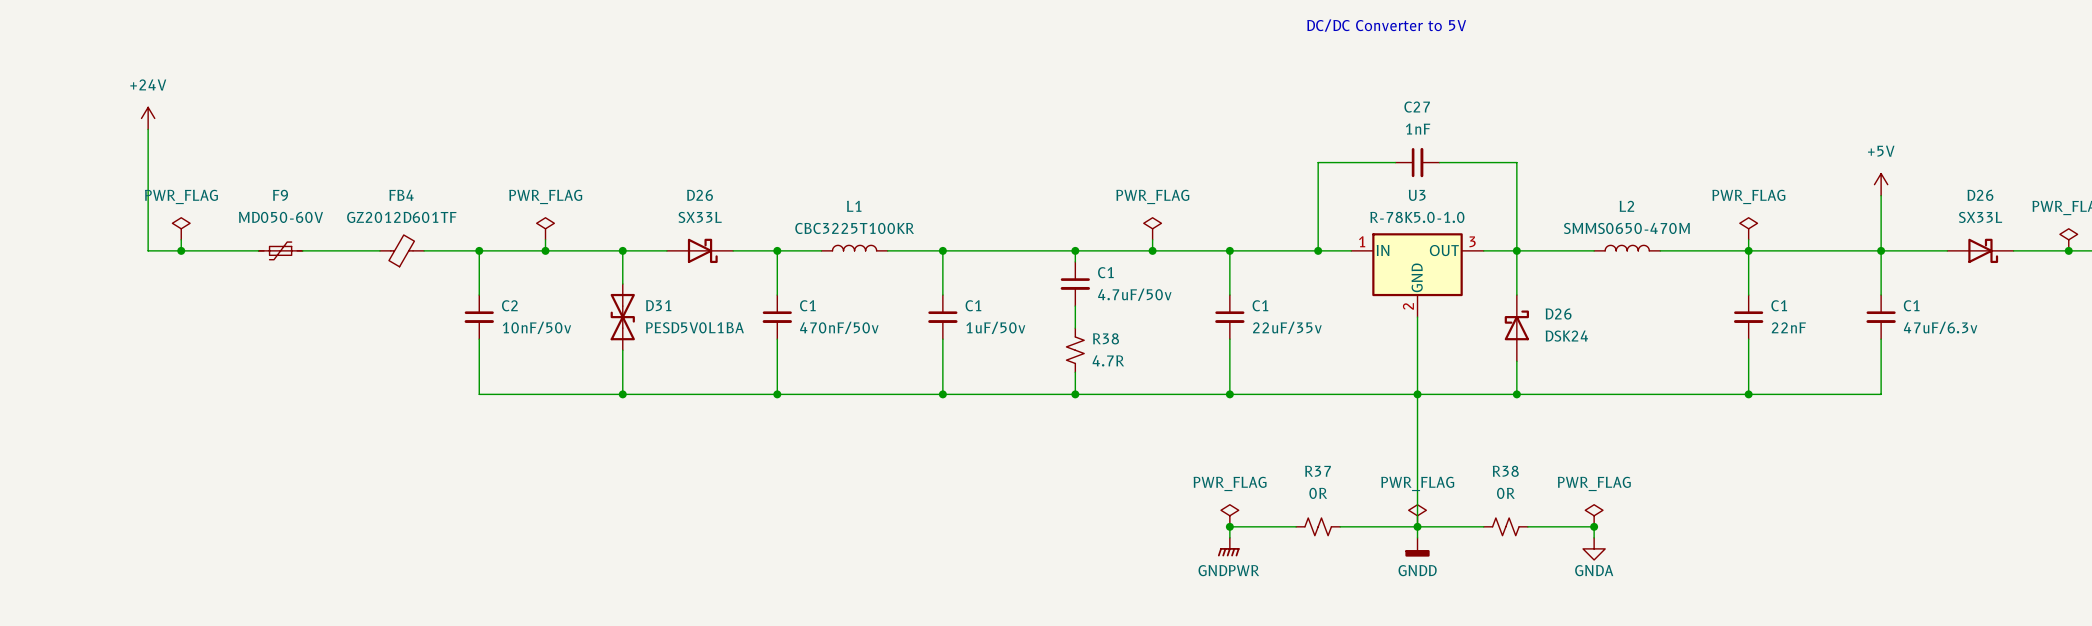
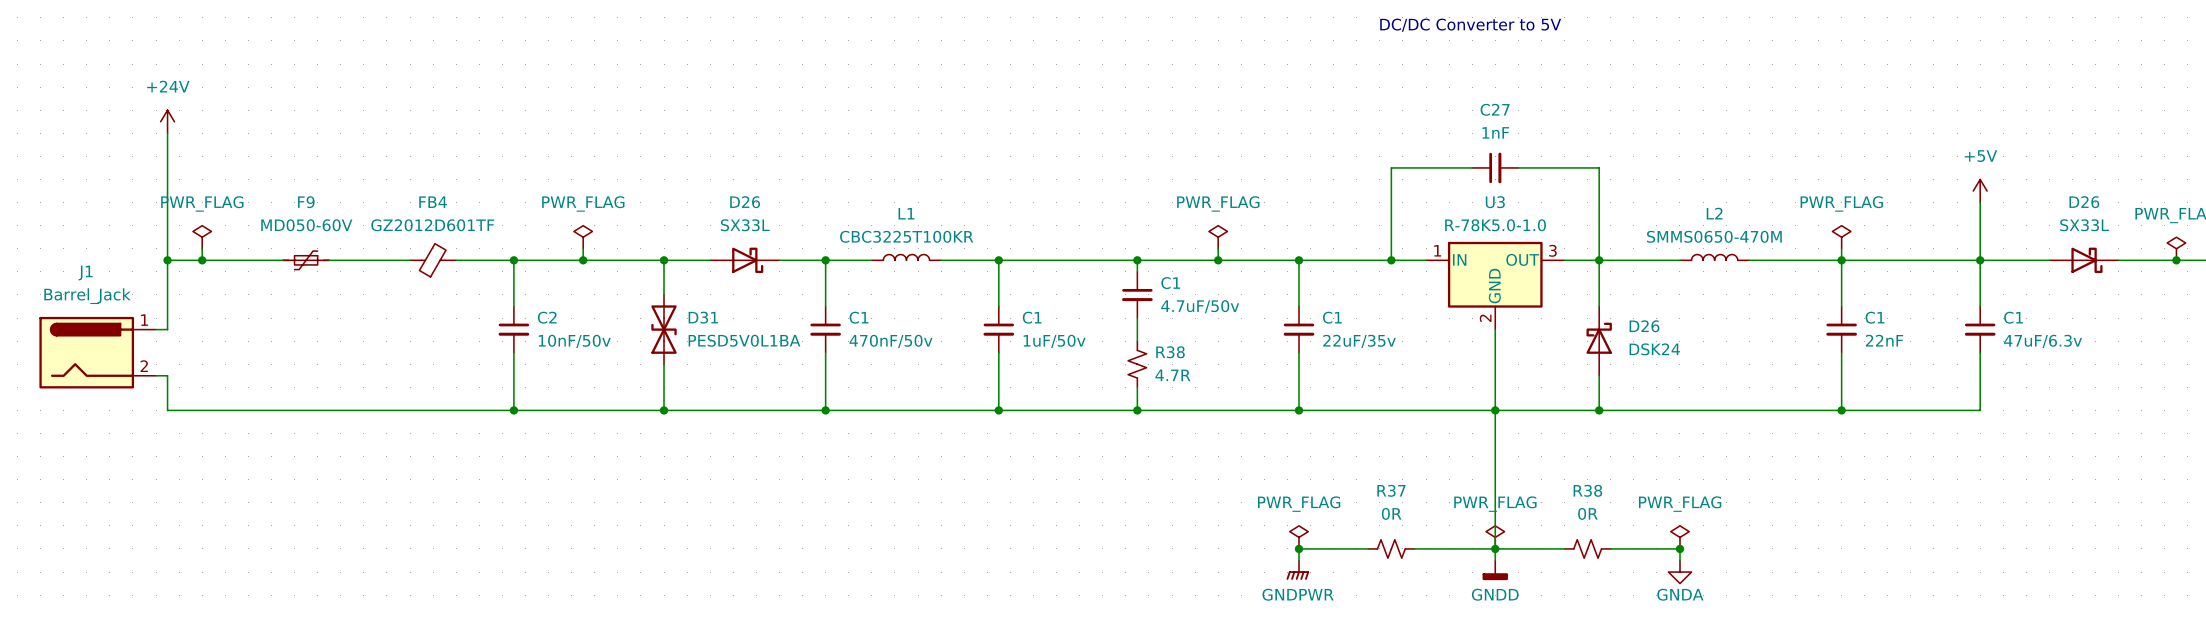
wire: none -> (167, 260) (167, 329) (156, 329)
junction: none -> (167, 260)
J1: none -> Barrel_Jack (97, 352)
wire: none -> (156, 375) (167, 375) (167, 410) (513, 410)
junction: none -> (513, 410)

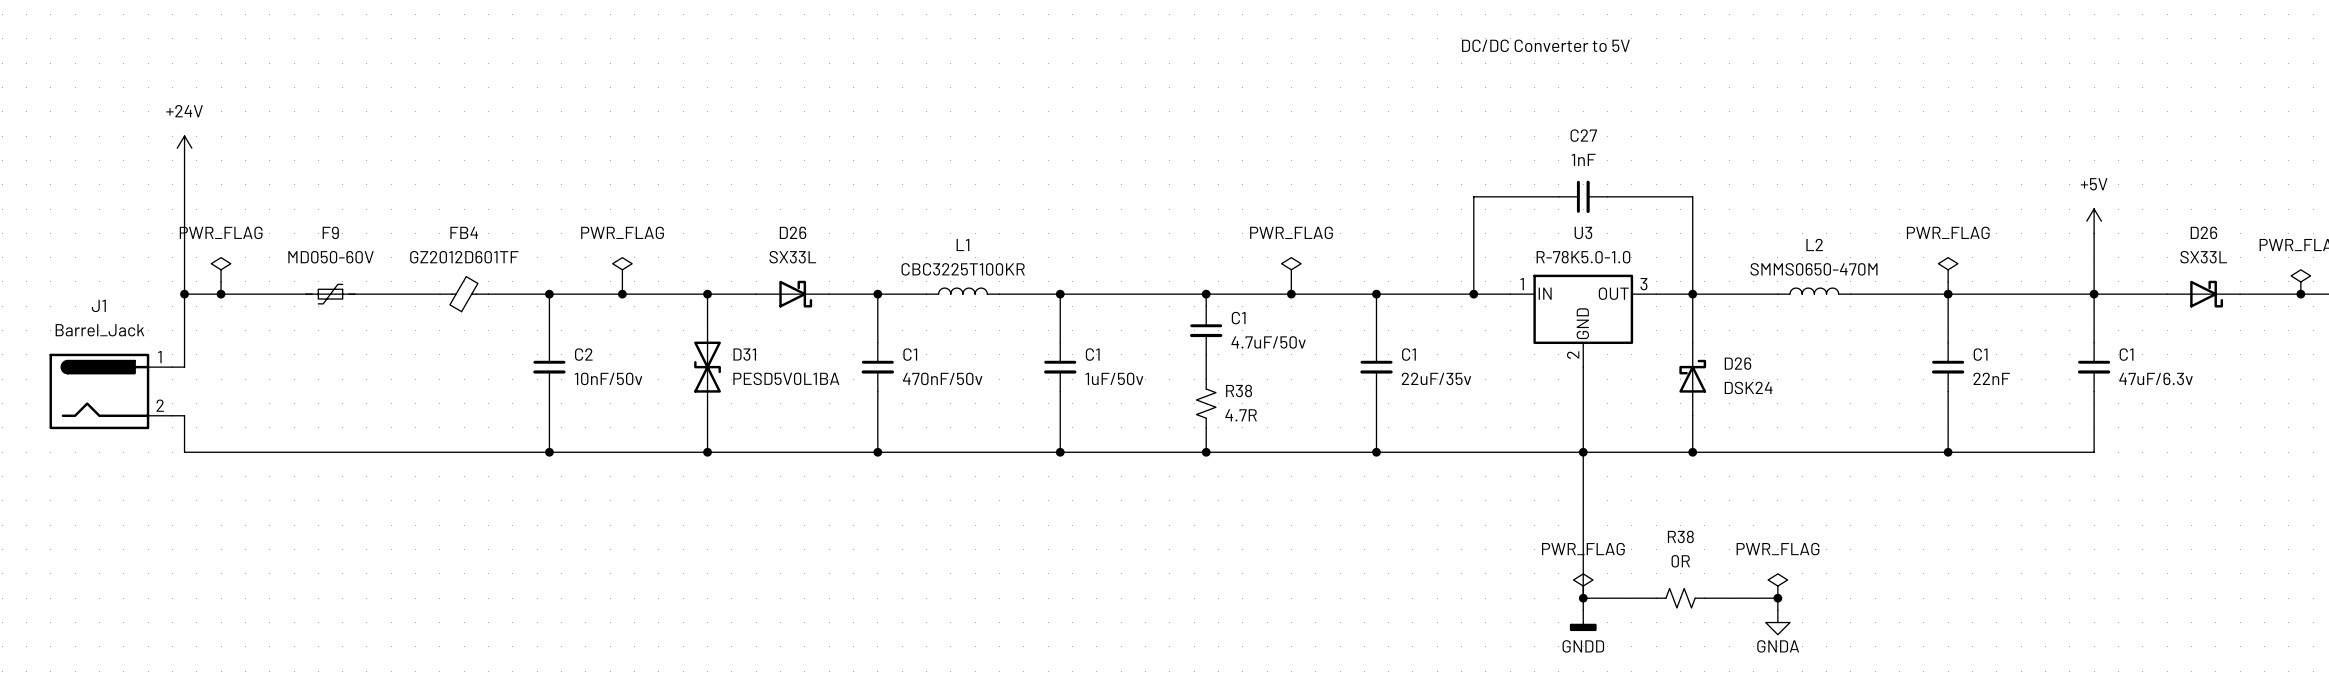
power symbol: PWR_FLAG (1299, 537) -> none
junction: (1299, 548) -> none
wire: (1368, 548) (1299, 548) (1299, 560) -> none
R37: 0R (1391, 548) -> none
wire: (1414, 548) (1495, 548) -> none
power symbol: GNDPWR (1297, 570) -> none

